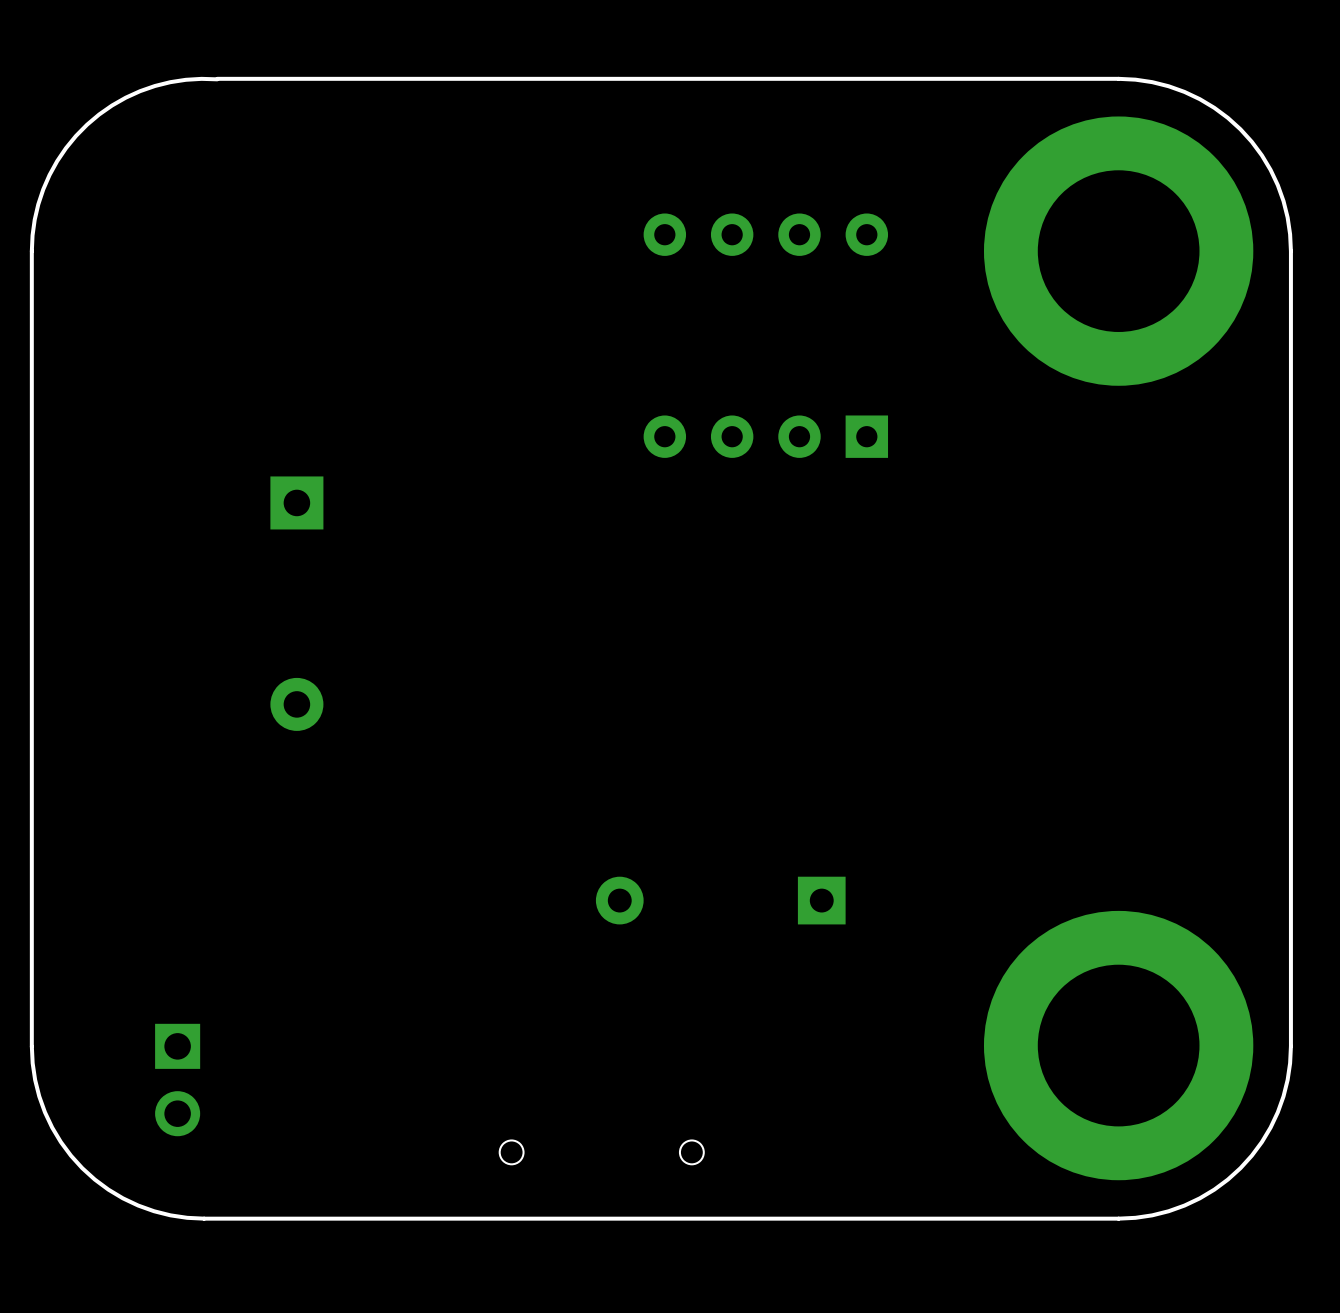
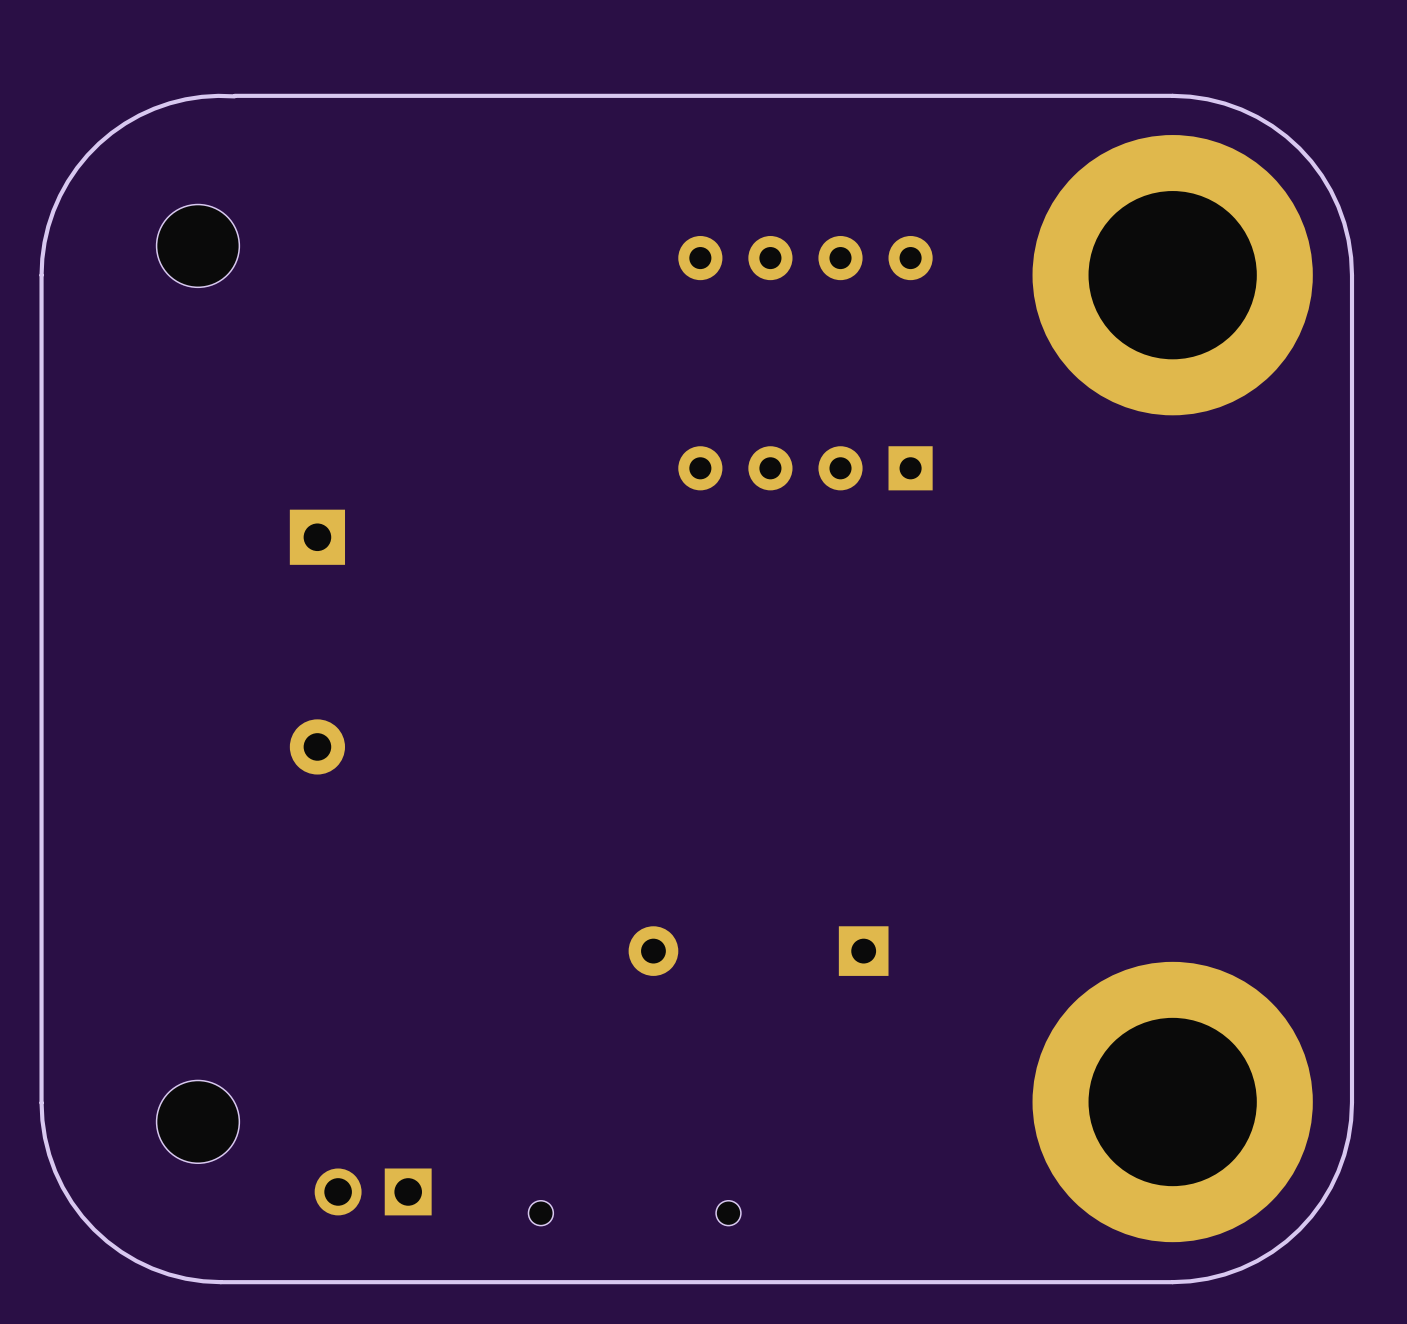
part: none -> (197, 245)
part footprint: [155, 1023, 201, 1137] -> [156, 1080, 240, 1164]
part: none -> (373, 1191)

